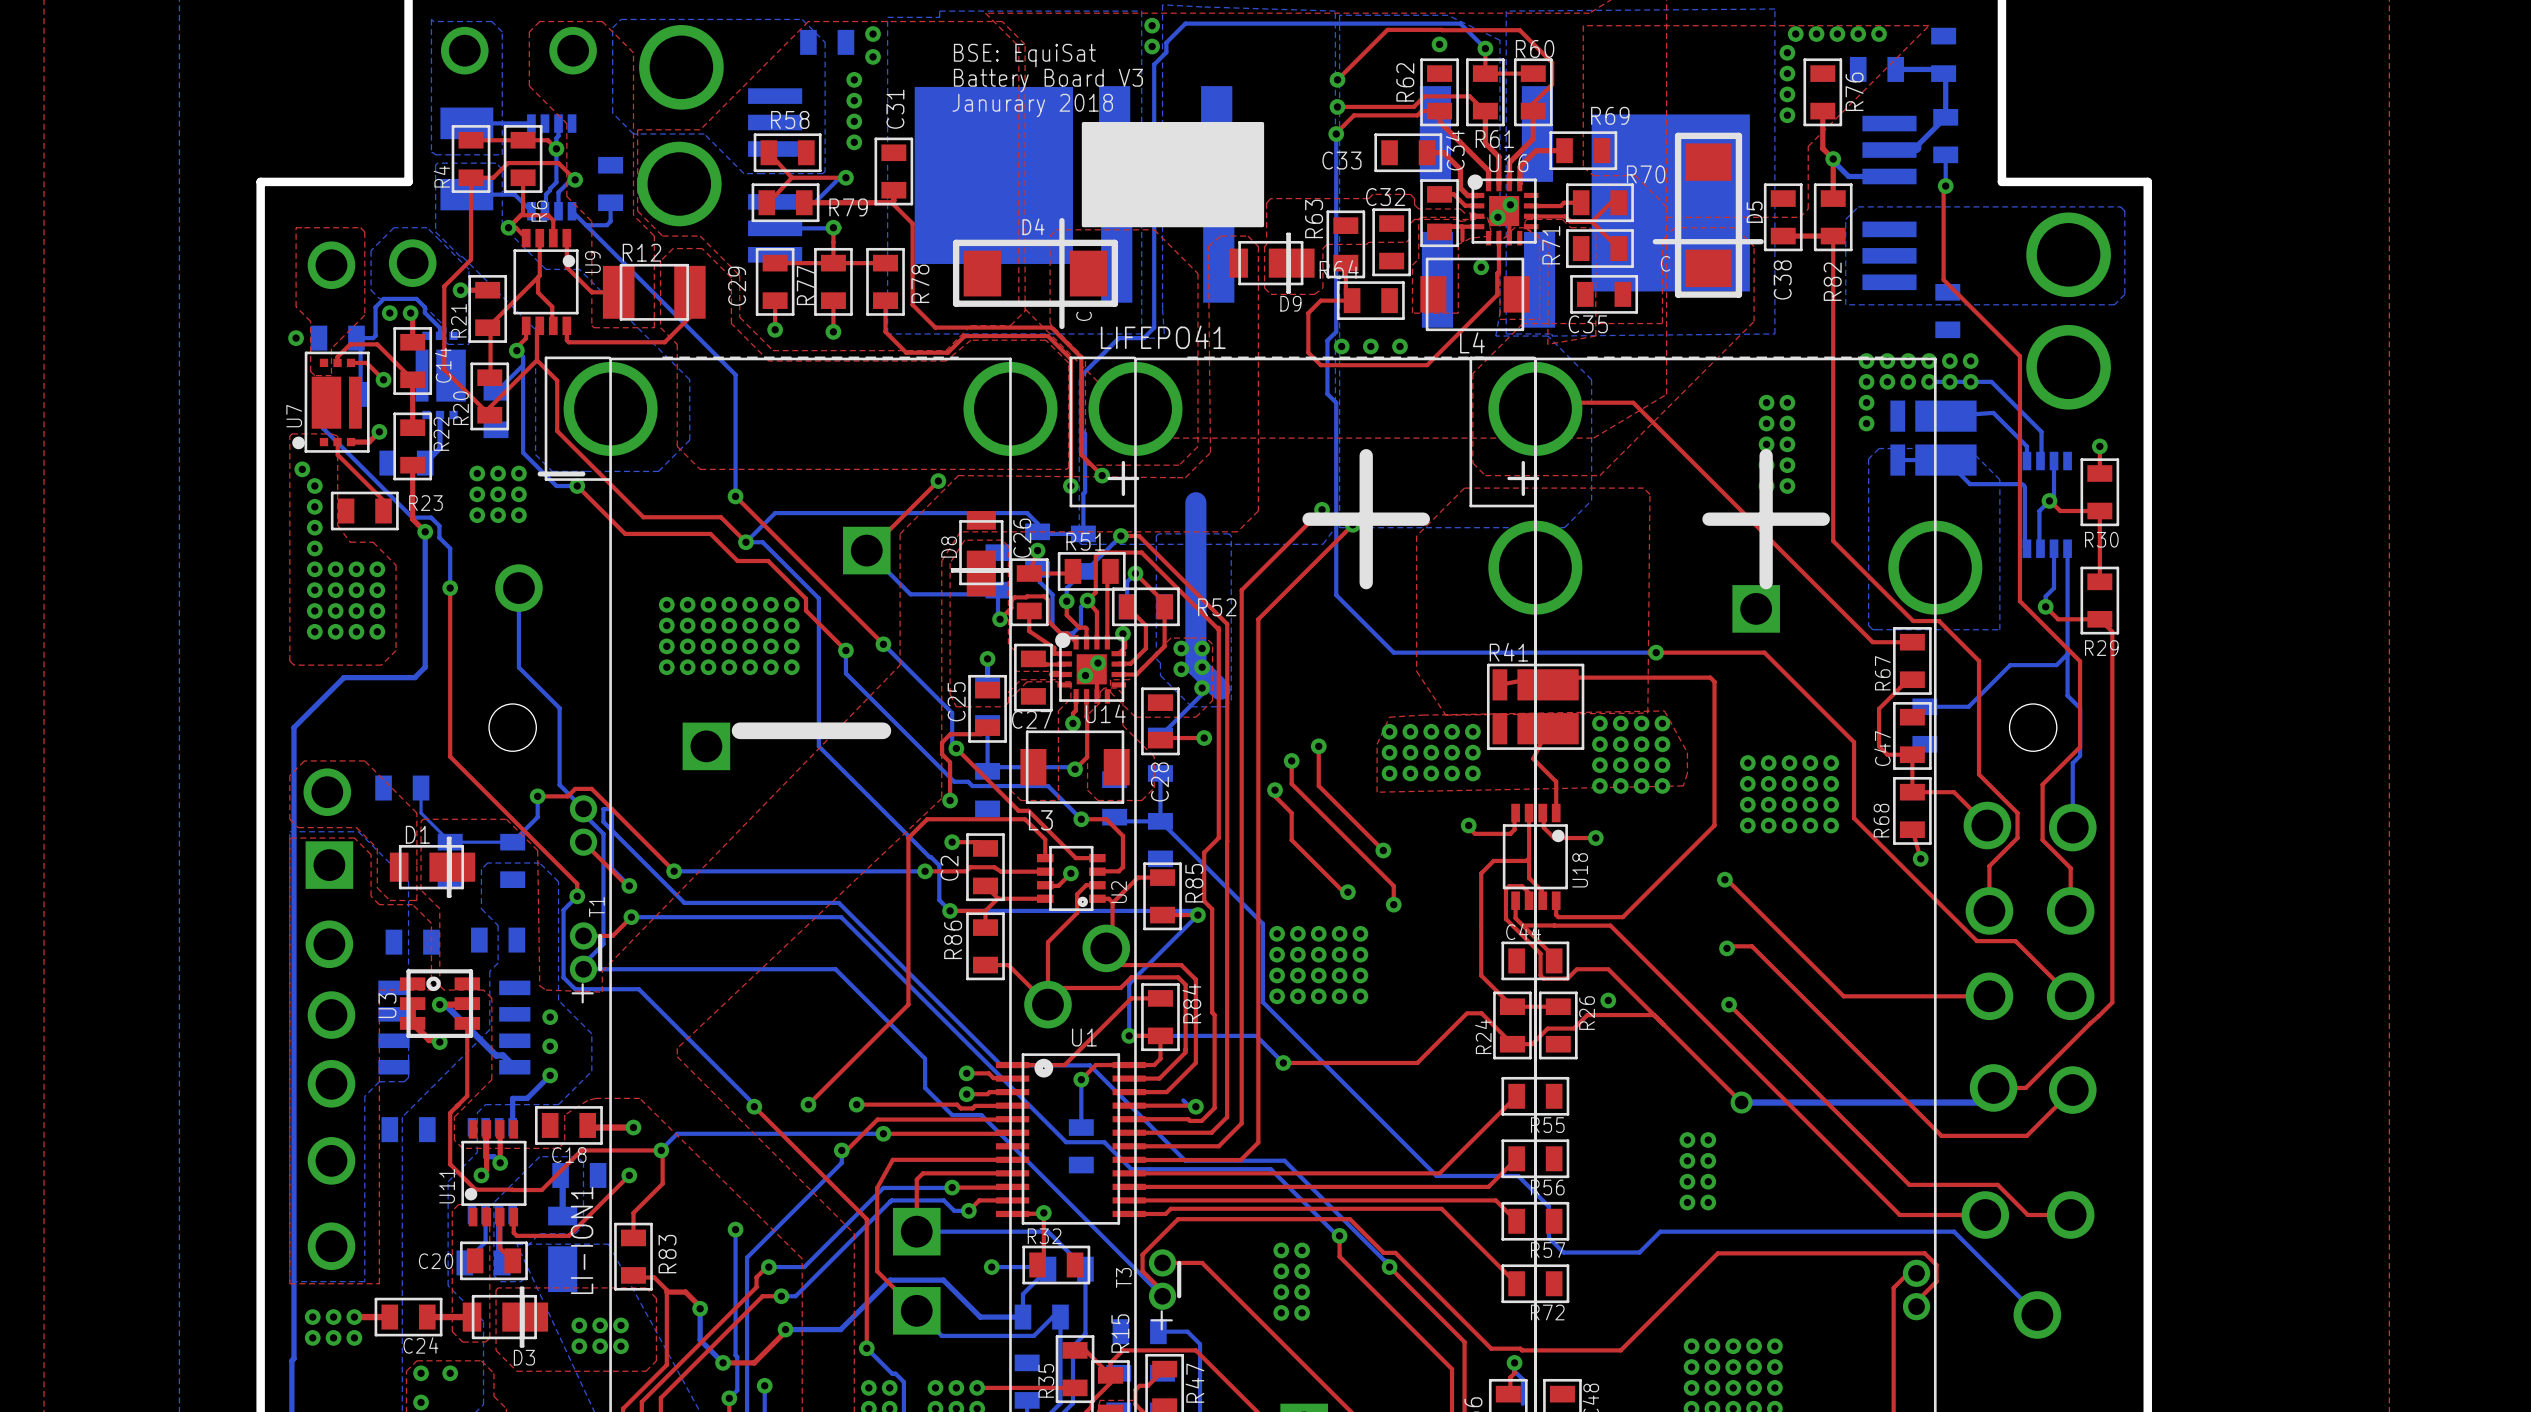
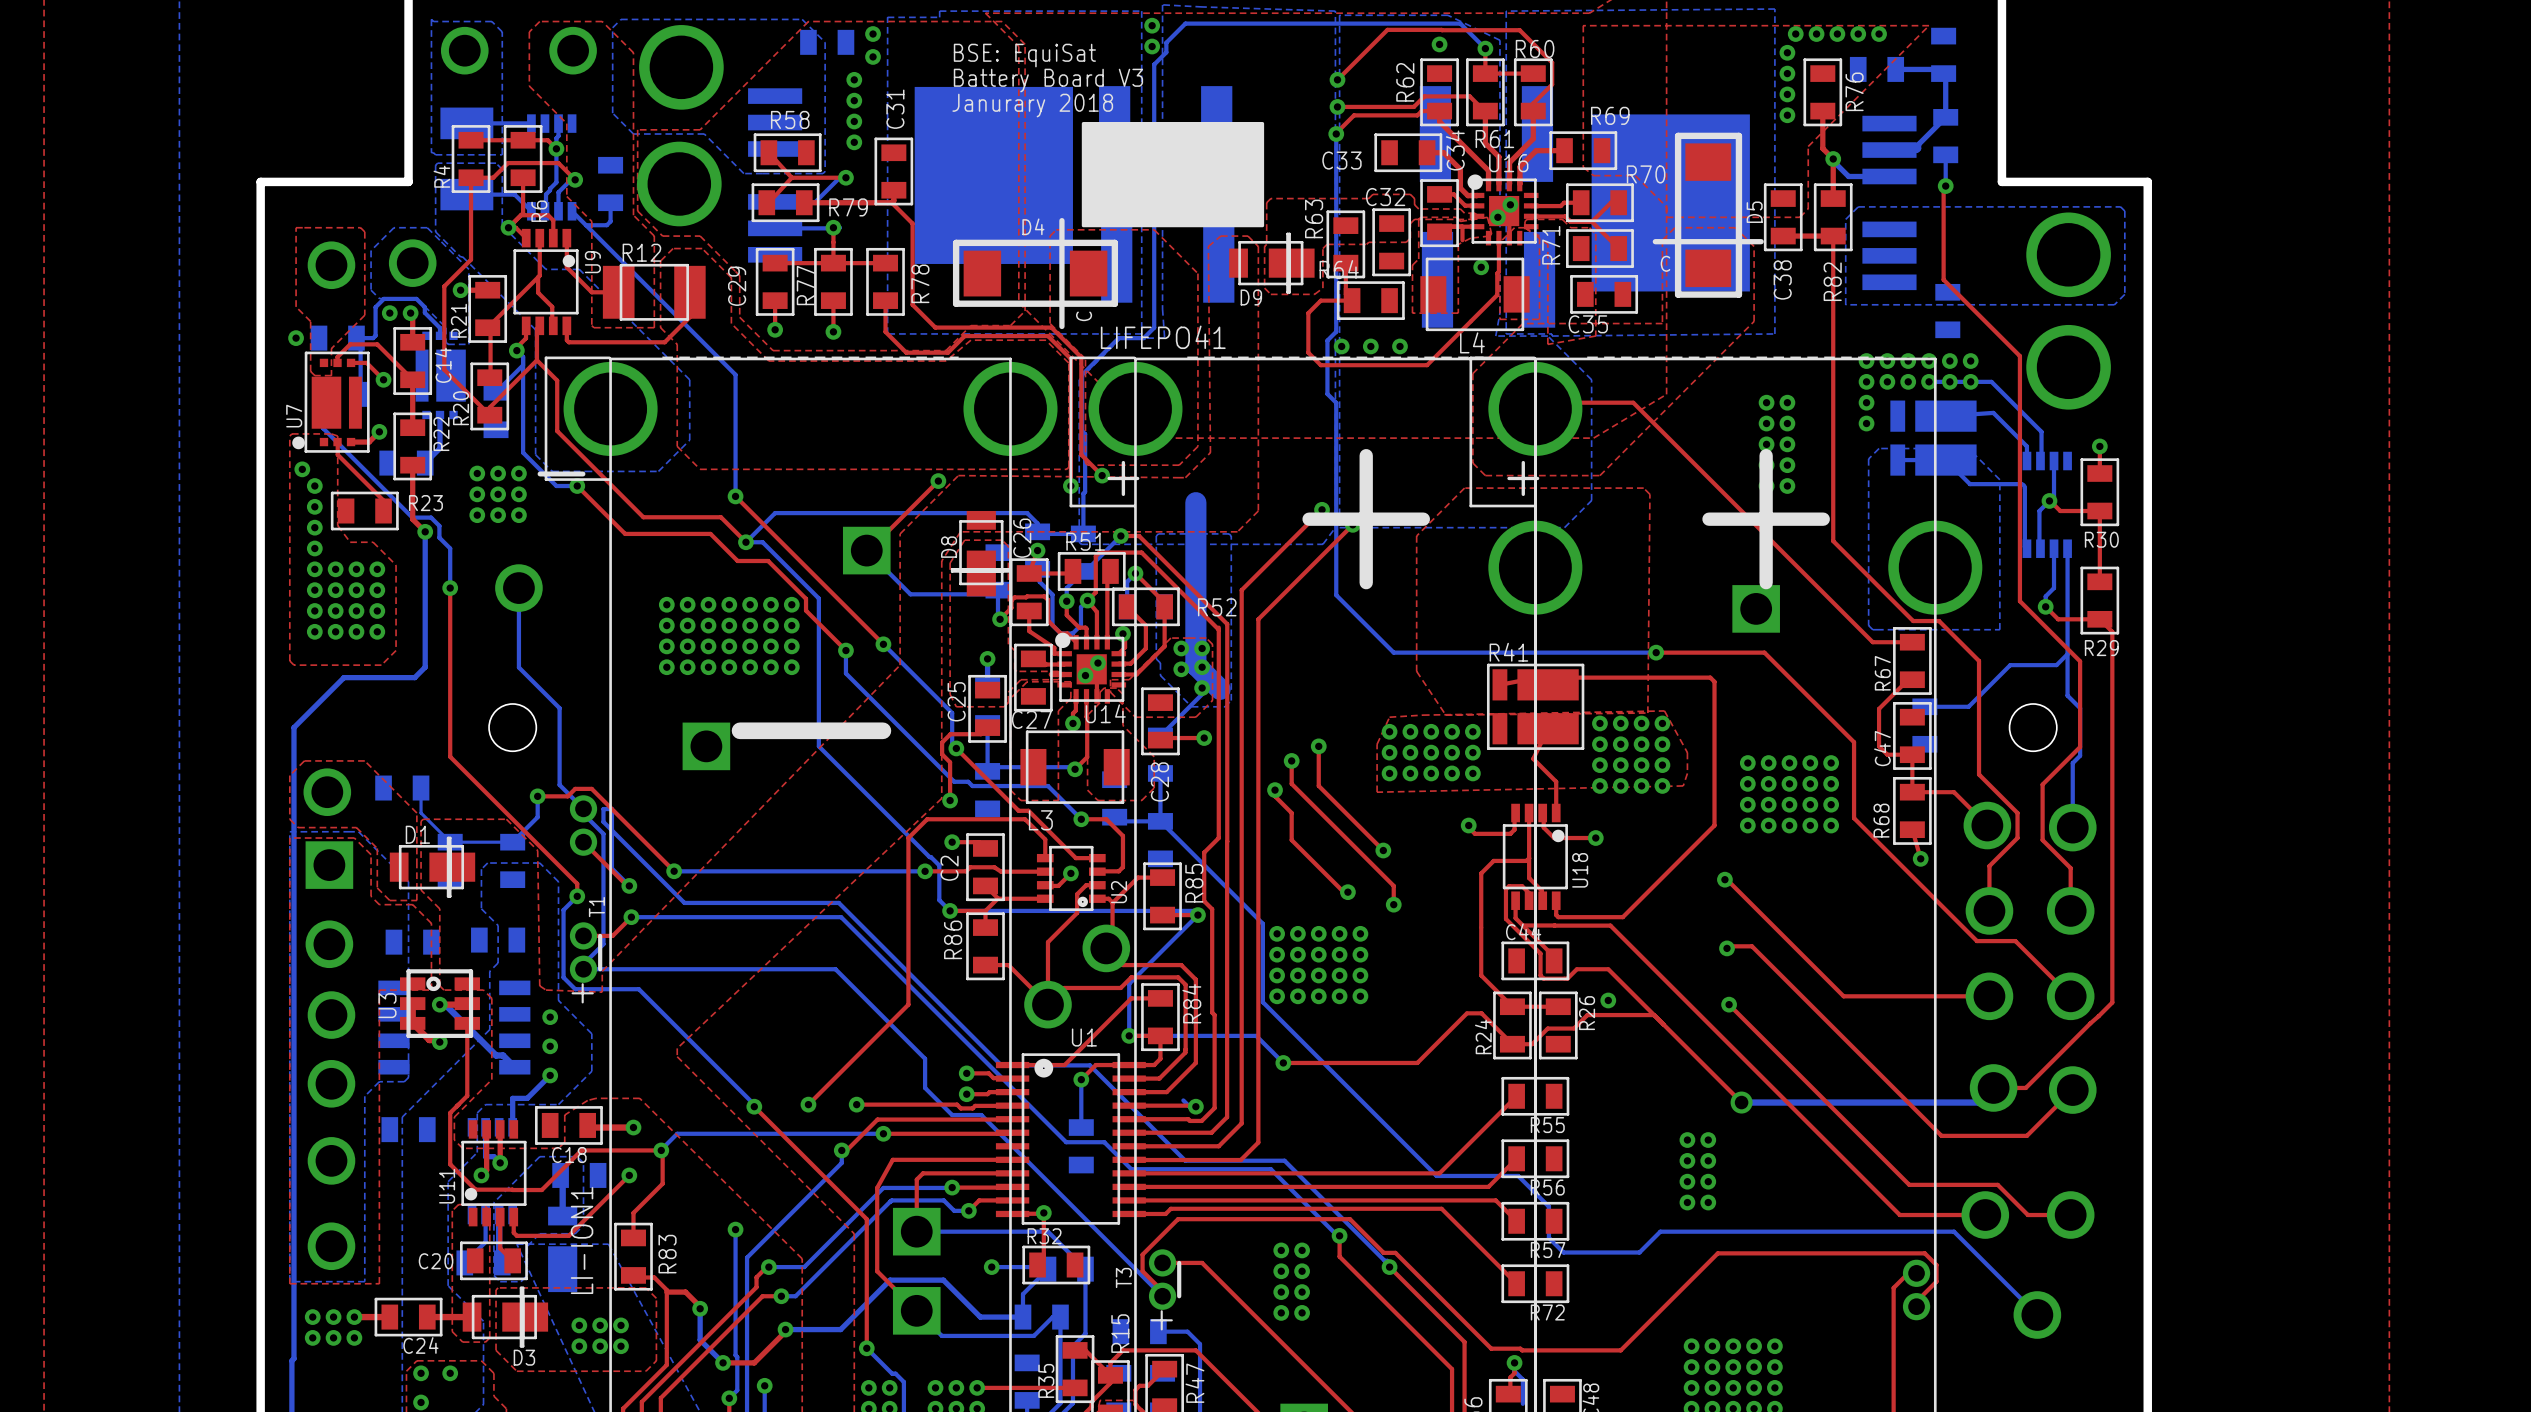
D9 name position: D9 (1290, 303) -> D9 (1251, 297)

